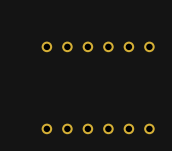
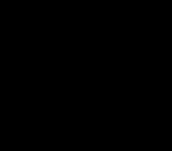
part: (98, 46) -> none
part: (98, 128) -> none

